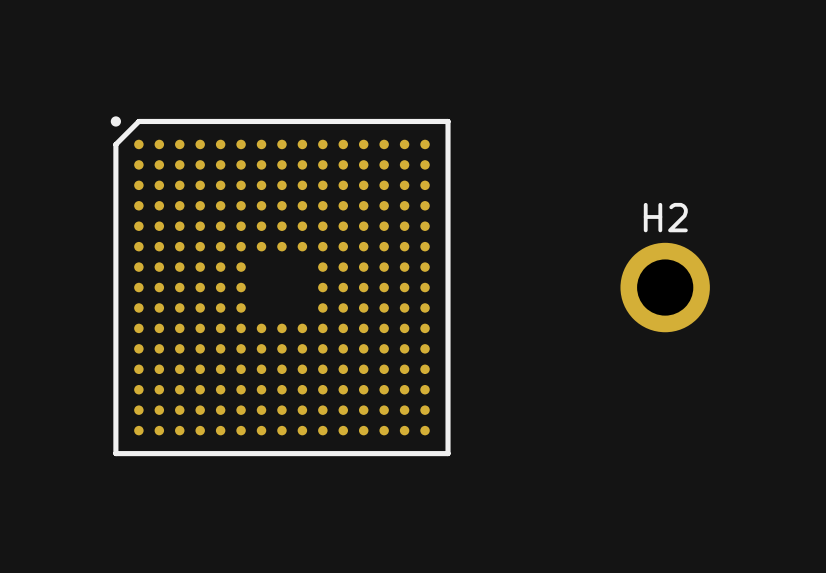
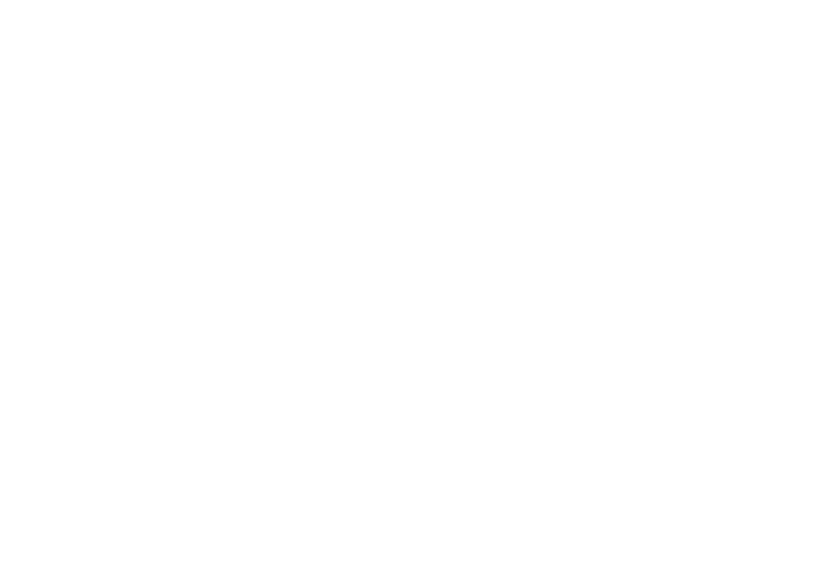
part: (280, 286) -> none
H2: (665, 287) -> none

